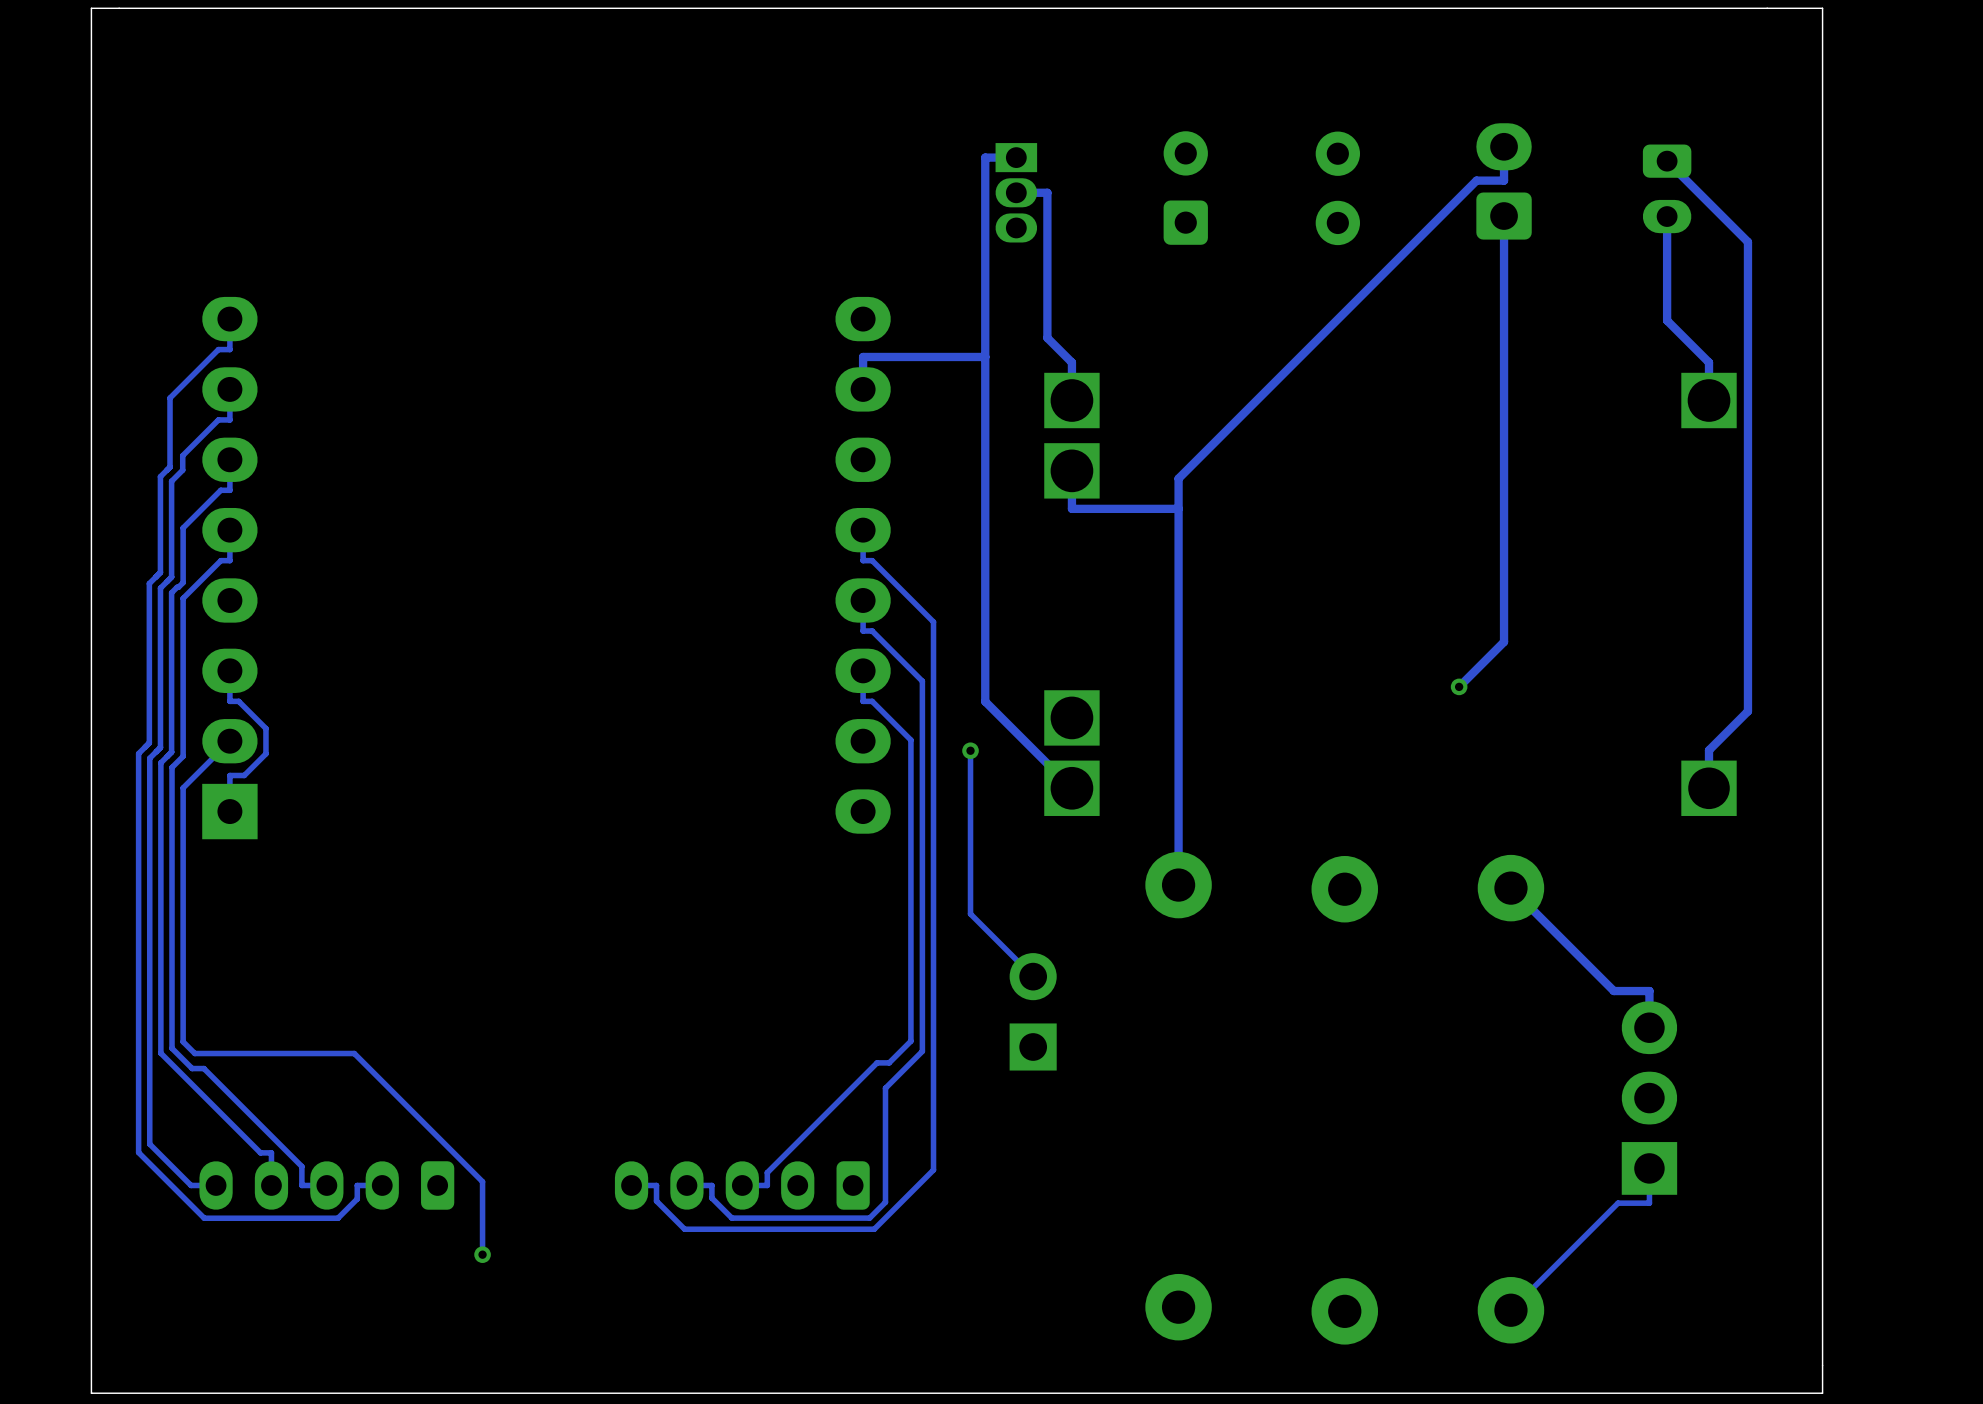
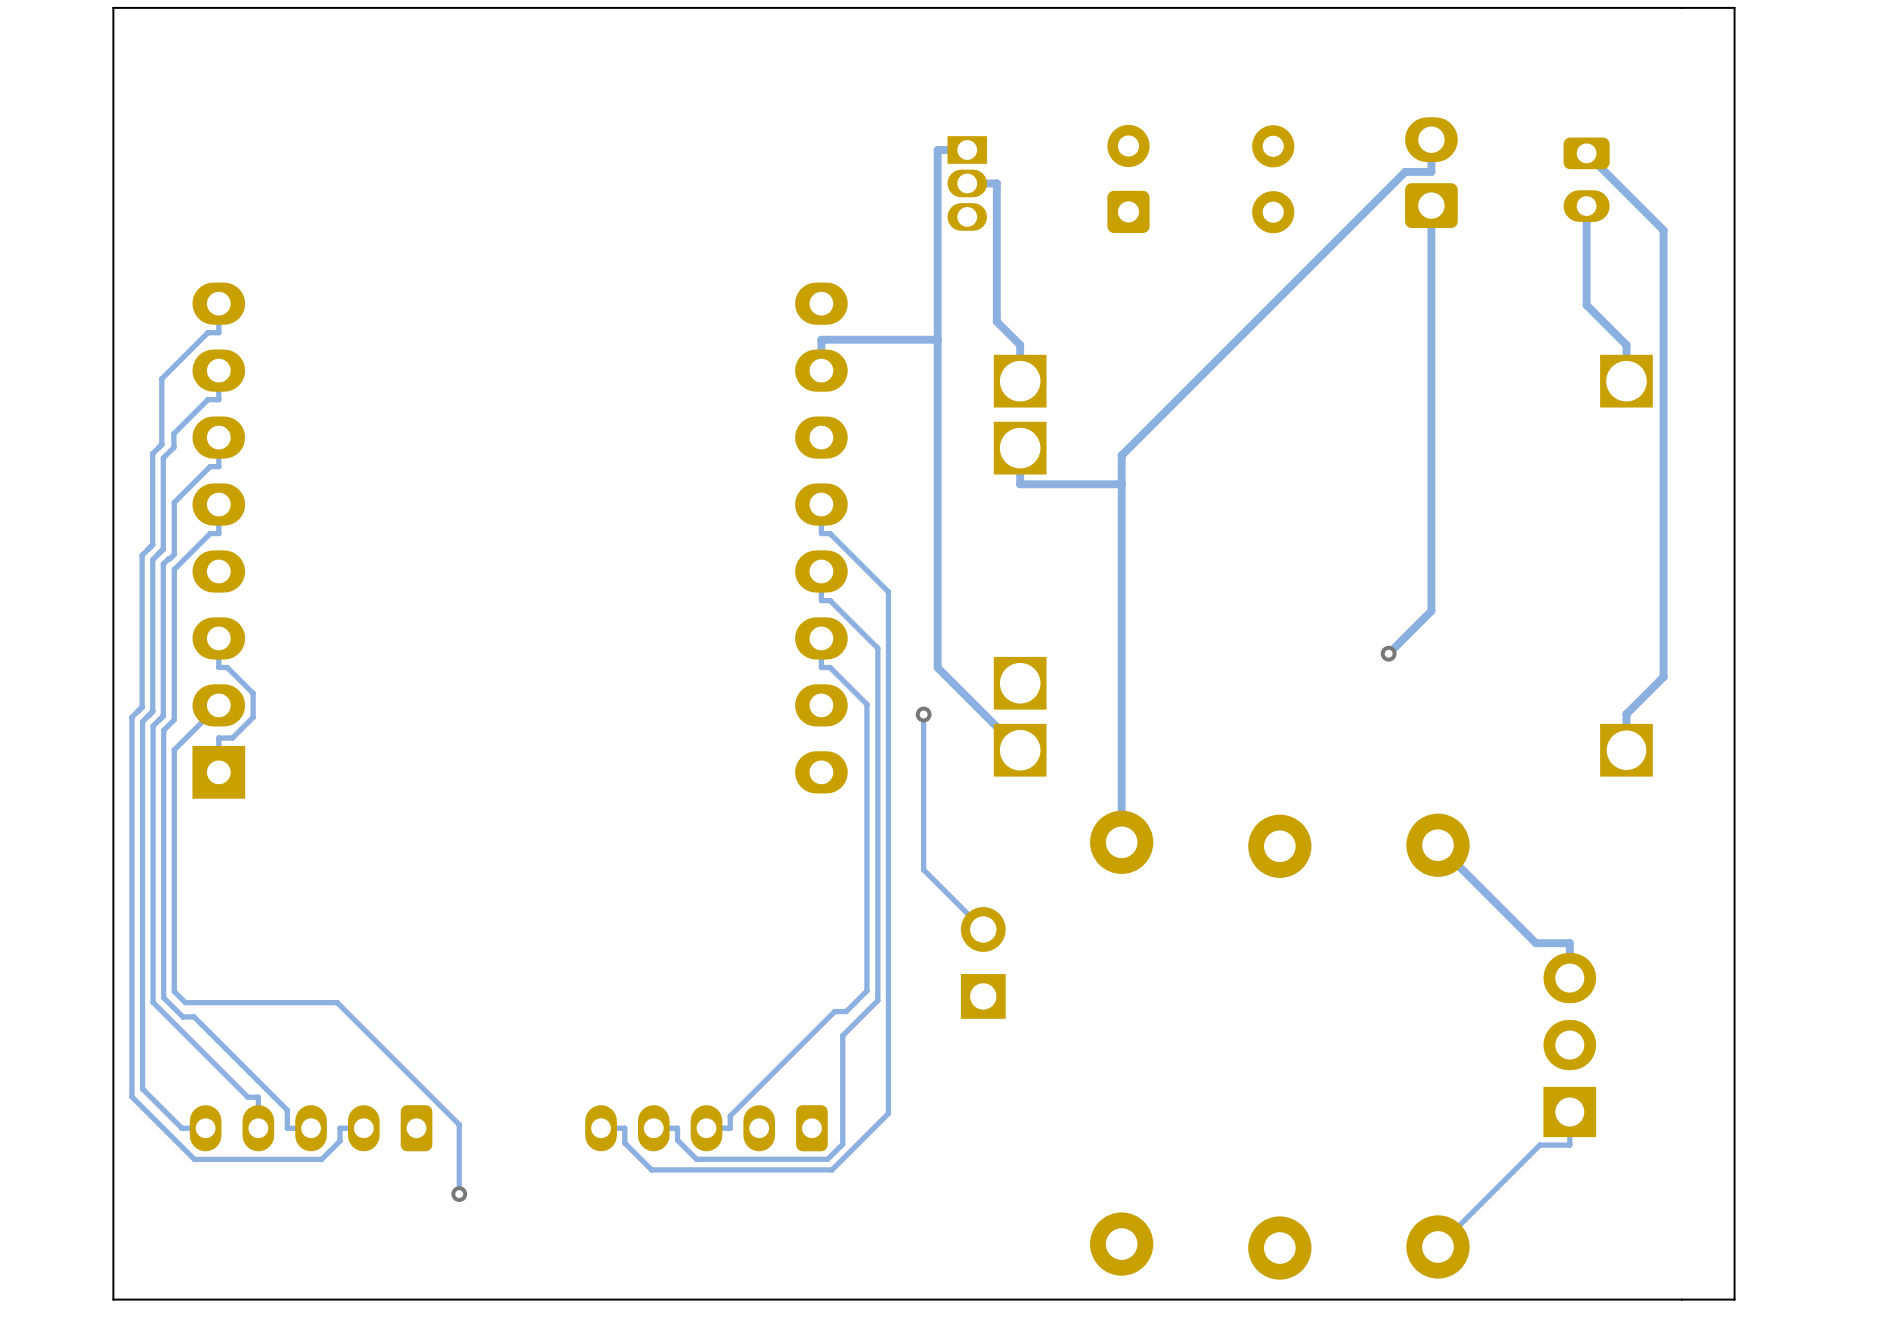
board edge: (119, 8) (91, 8) (91, 1393) (1822, 1393) (1822, 1365) -> (113, 7) (113, 1299) (1734, 1299)

